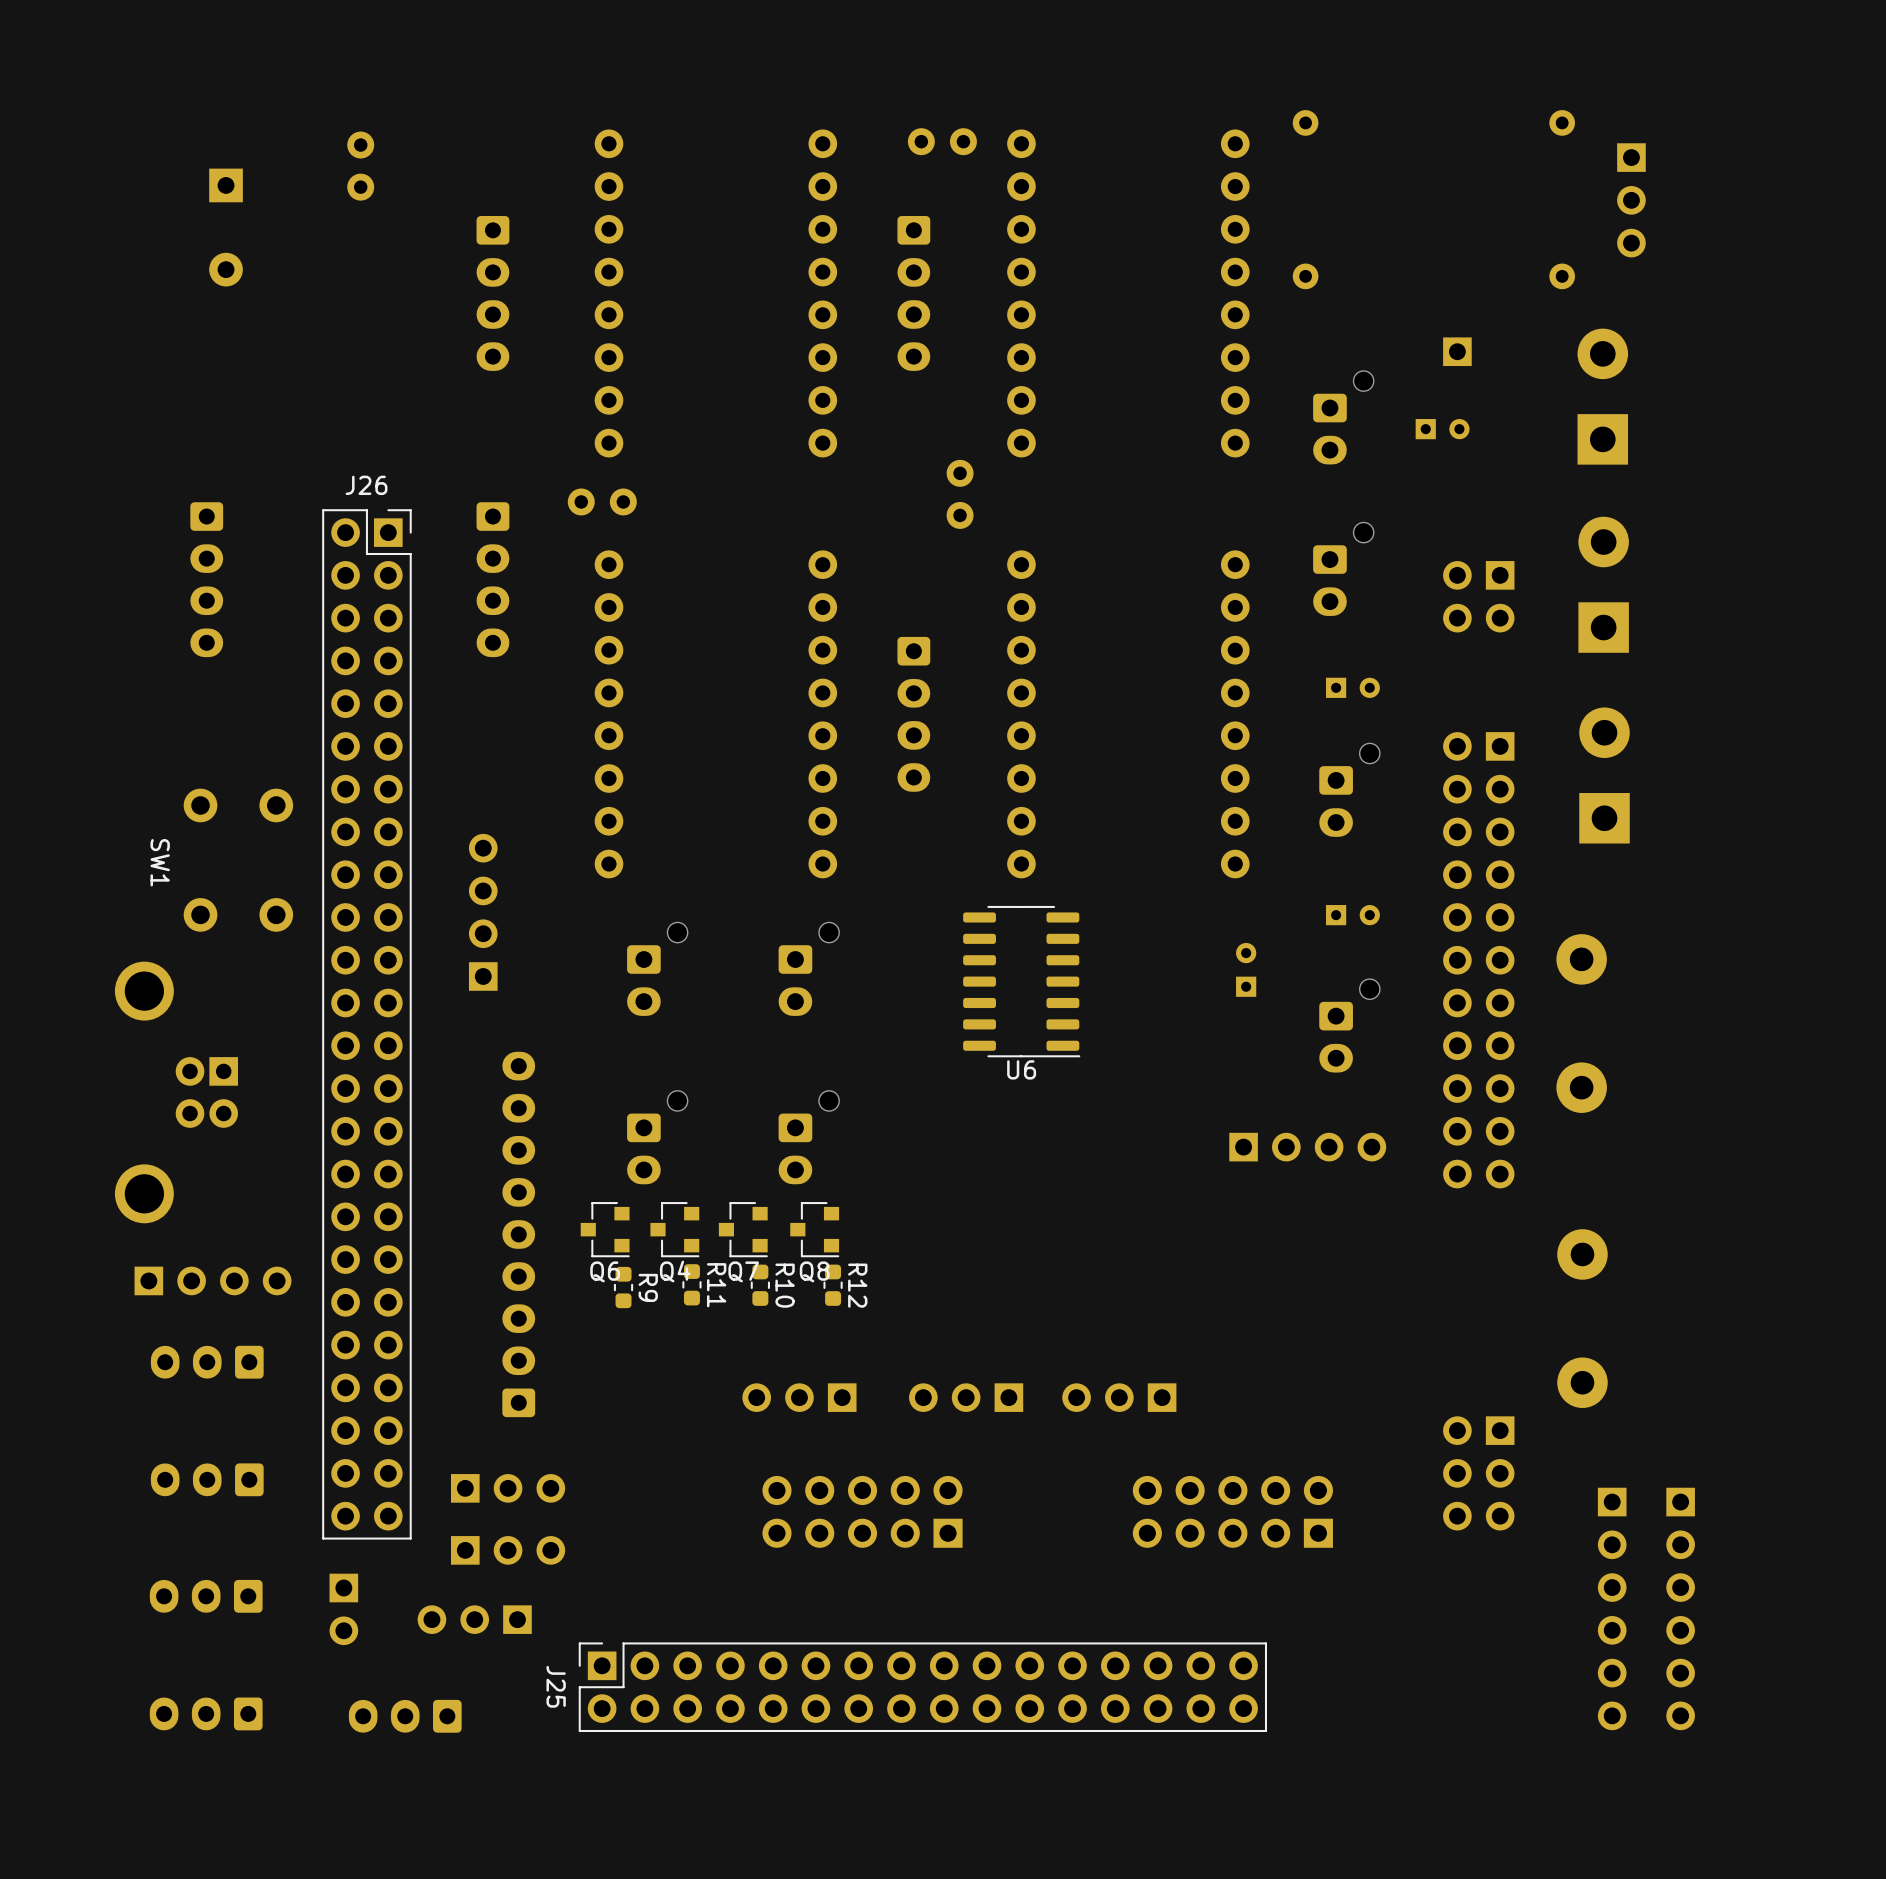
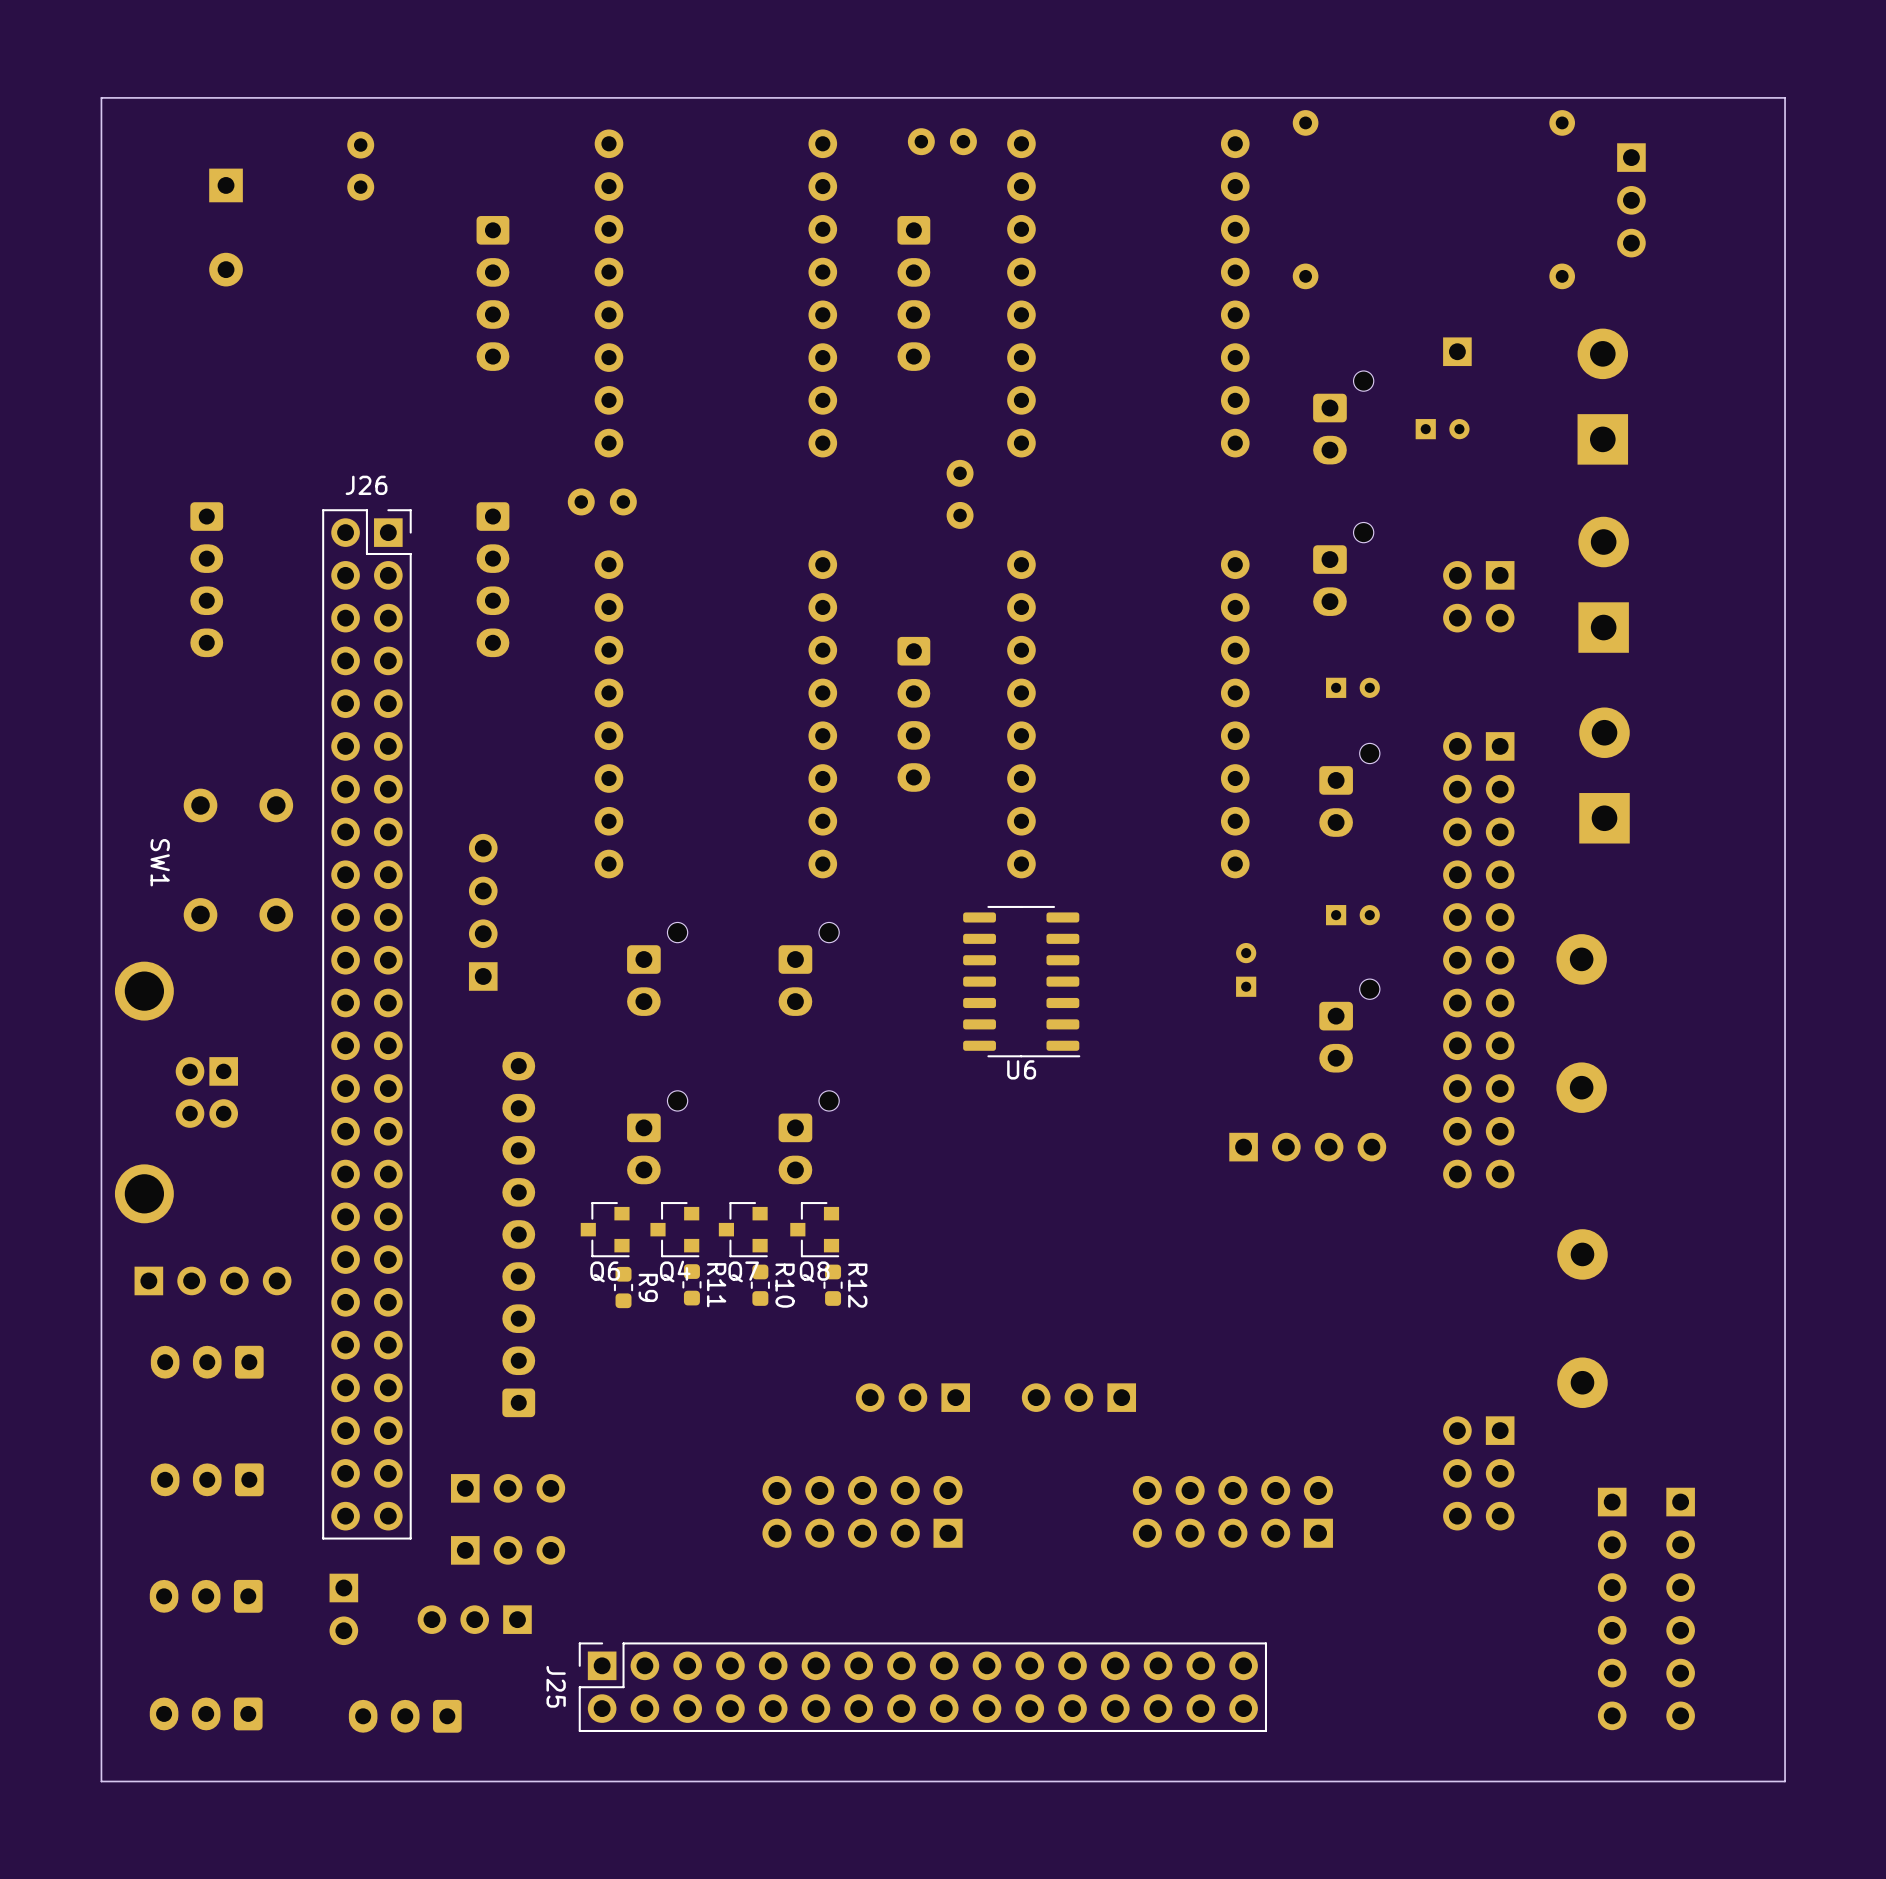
board edge: none -> (1785, 97) (101, 97) (101, 1781) (1785, 1781) (1785, 97)
part: (799, 1397) -> none
part position: (966, 1397) -> (912, 1397)
part position: (1119, 1397) -> (1078, 1397)

